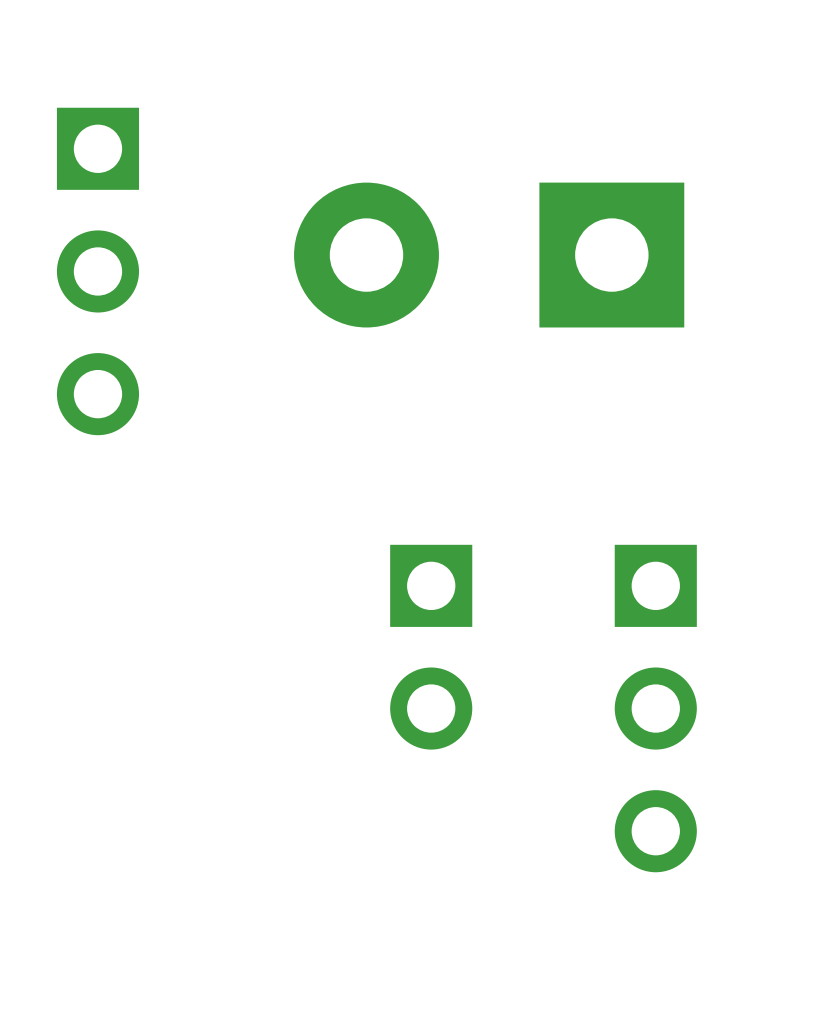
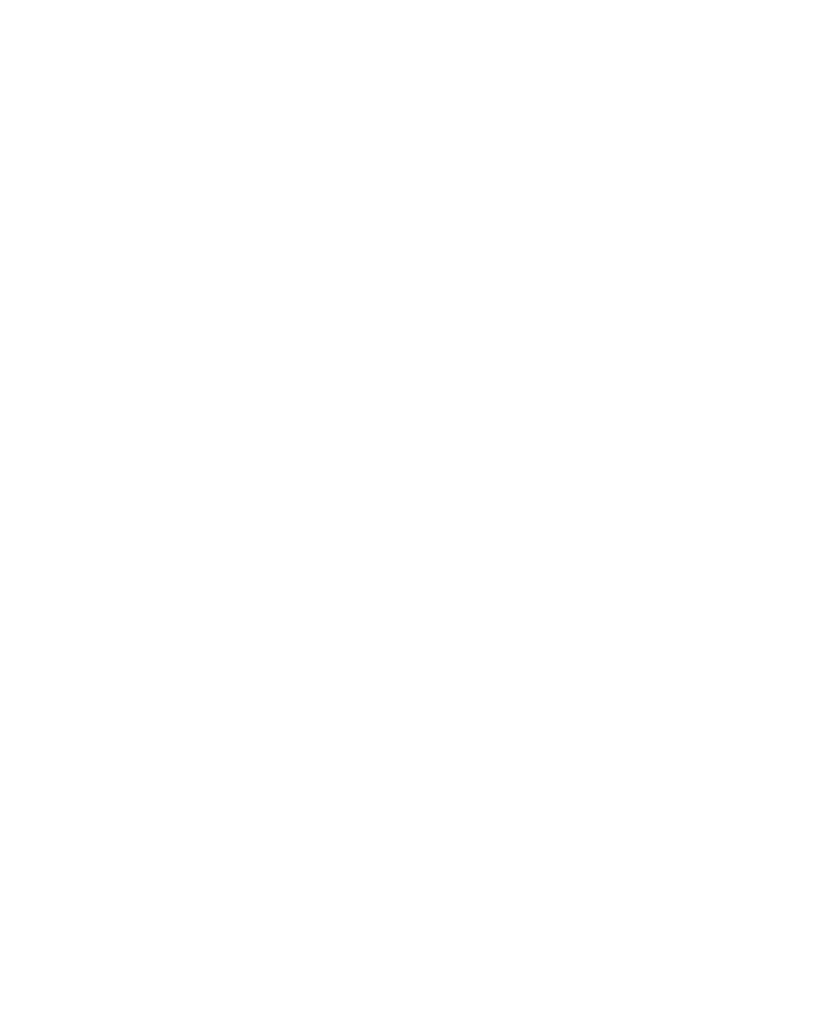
part: (489, 255) -> none
part: (97, 271) -> none
part: (431, 647) -> none
part: (655, 708) -> none

